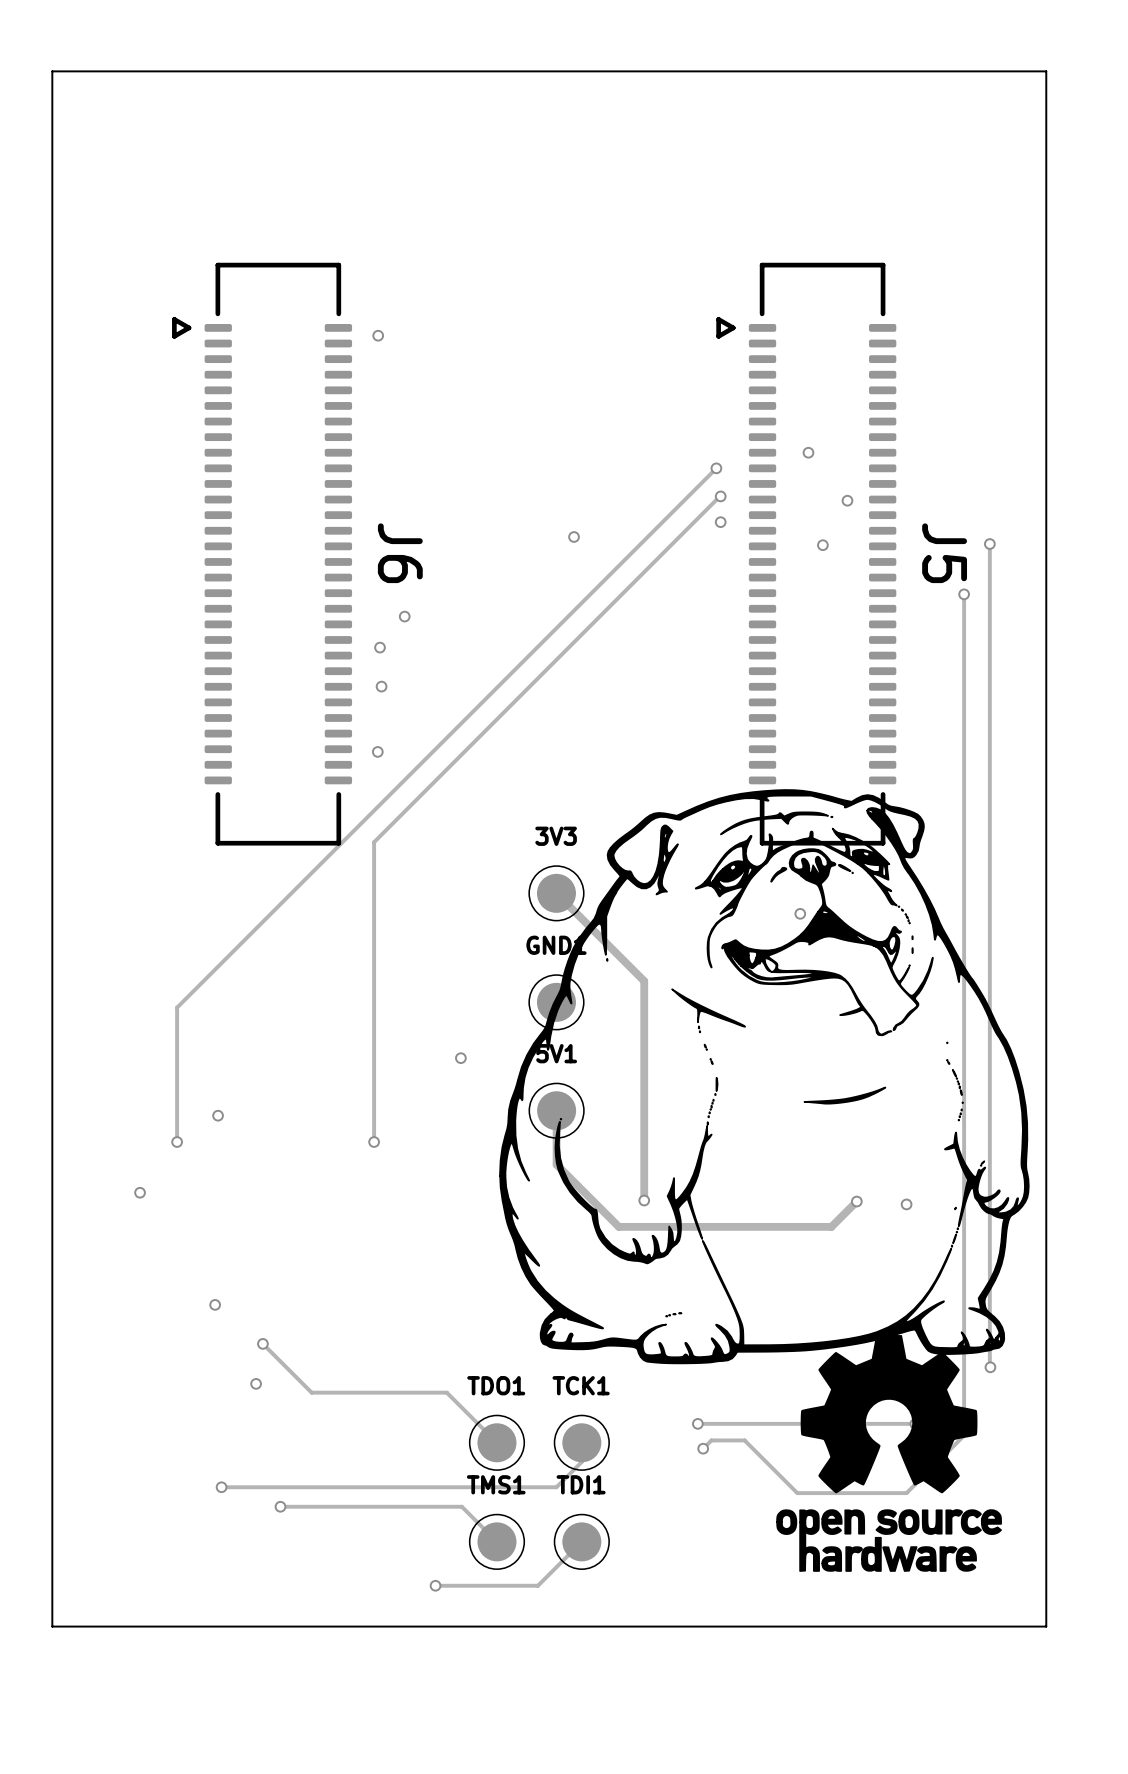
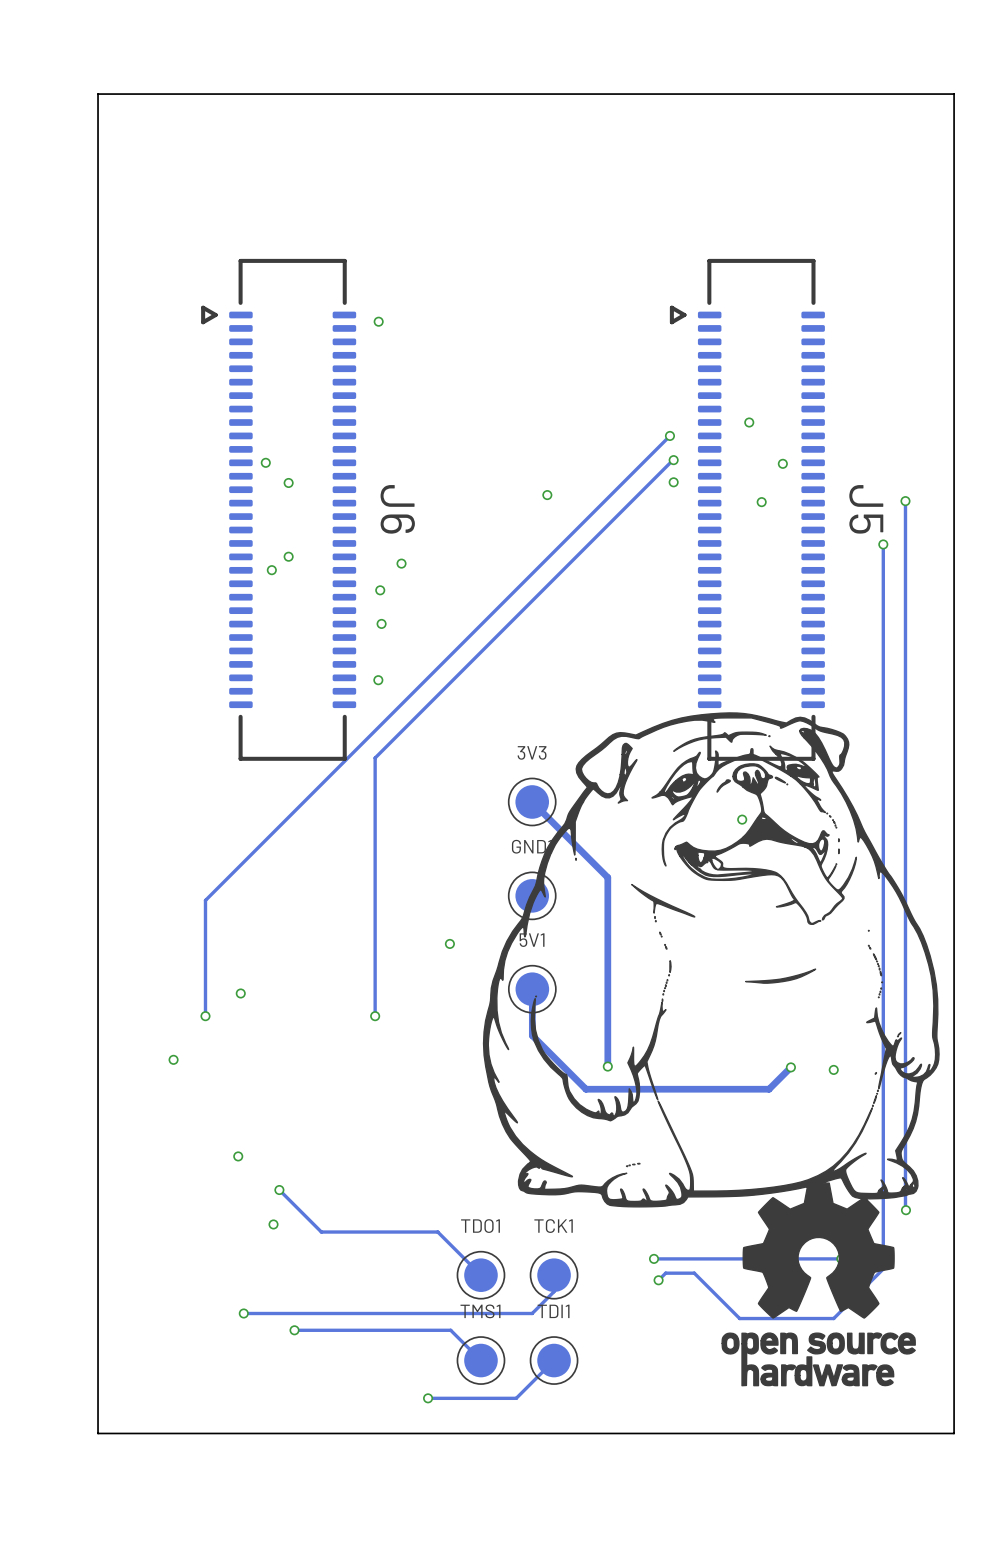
via: none -> (265, 462)
via: none -> (288, 482)
via: none -> (288, 556)
via: none -> (271, 570)

